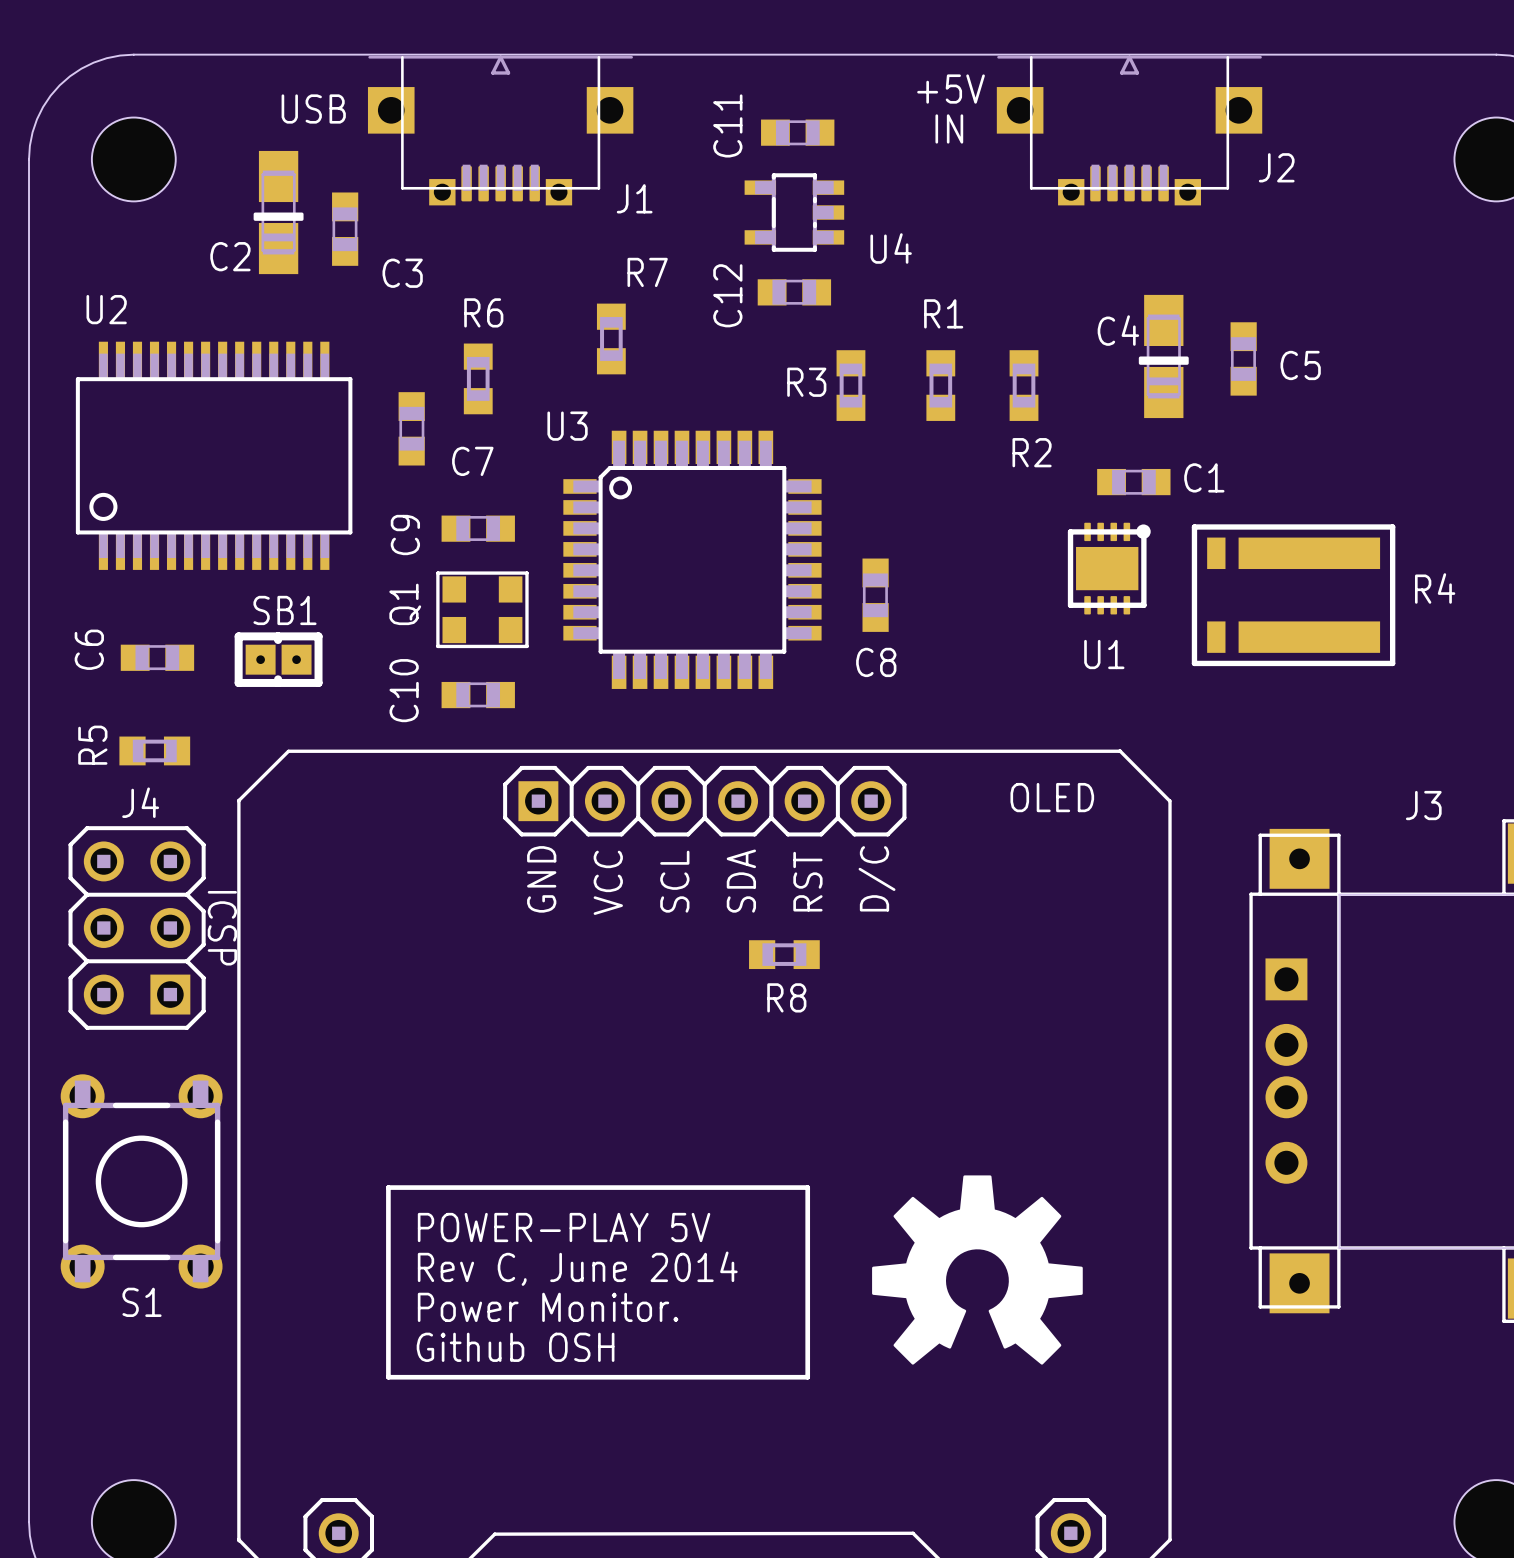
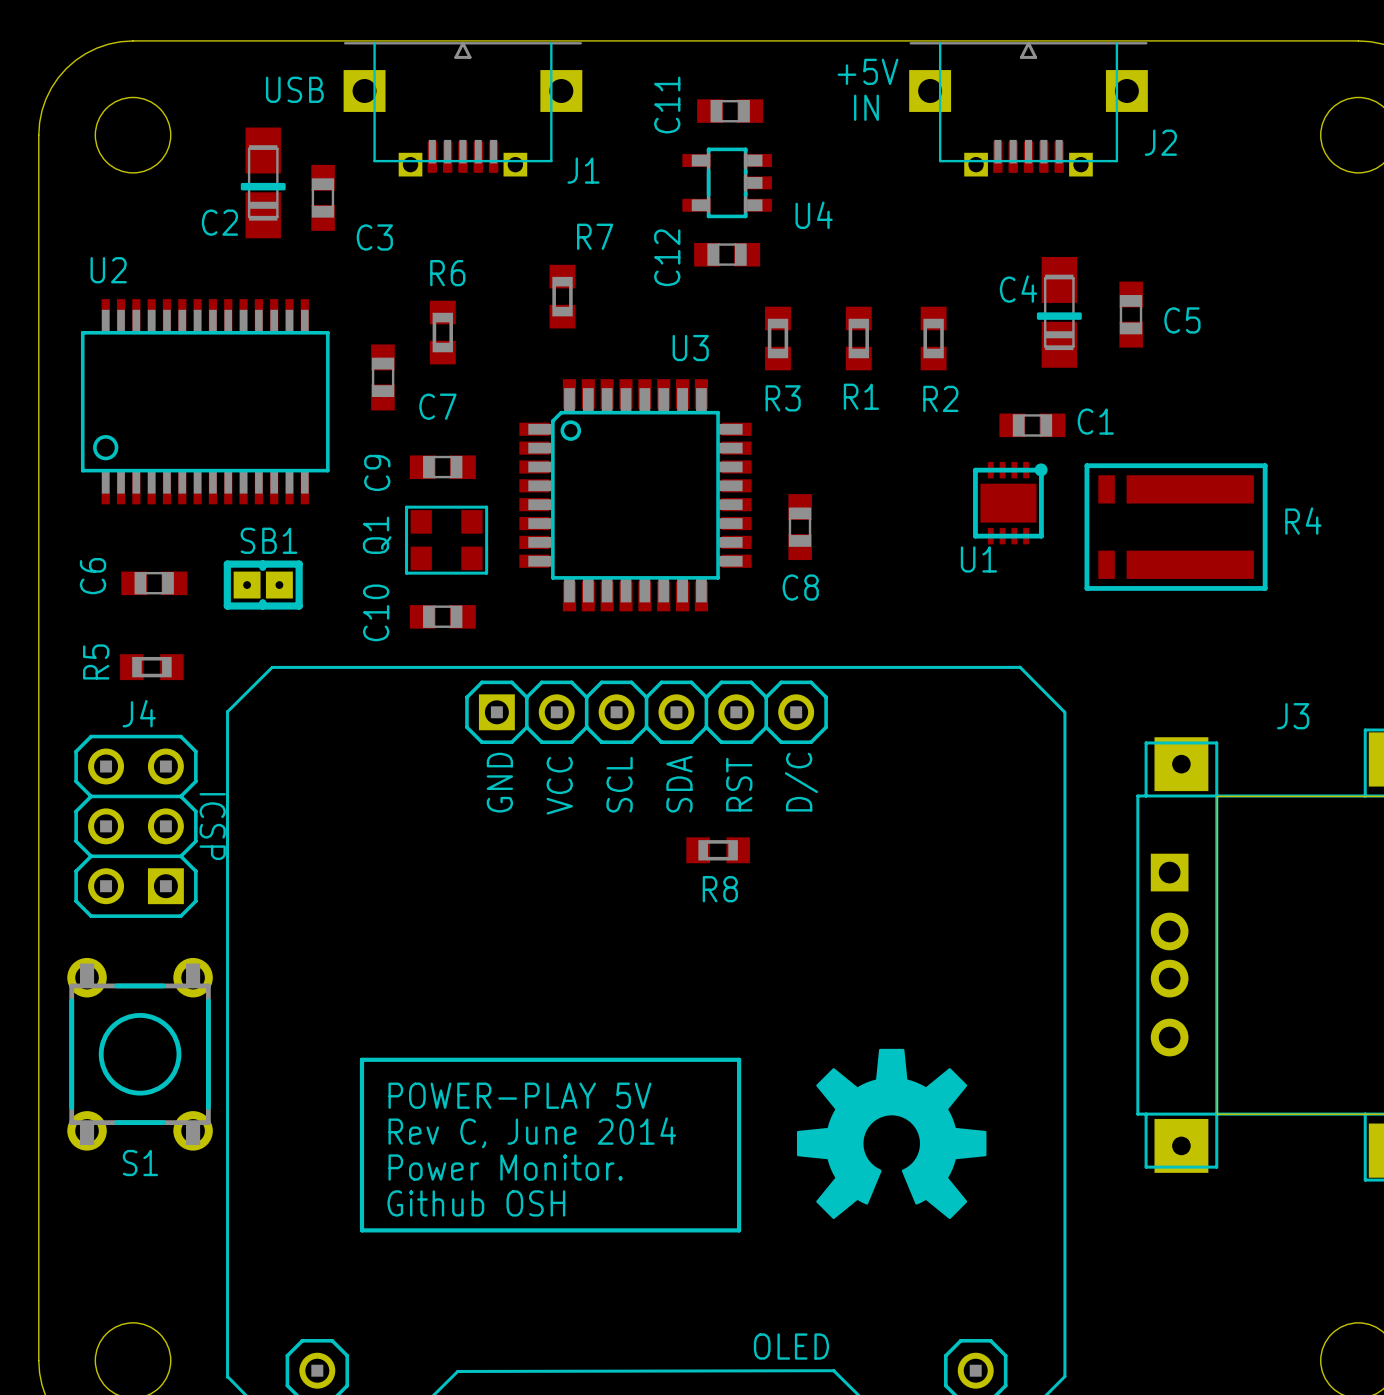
R1 name position: R1 (943, 313) -> R1 (861, 396)
R3 name position: R3 (806, 382) -> R3 (783, 398)
U3 name position: U3 (567, 426) -> U3 (690, 348)
U1 name position: U1 (1104, 654) -> U1 (978, 559)
OLED name position: OLED (1052, 797) -> OLED (791, 1346)

